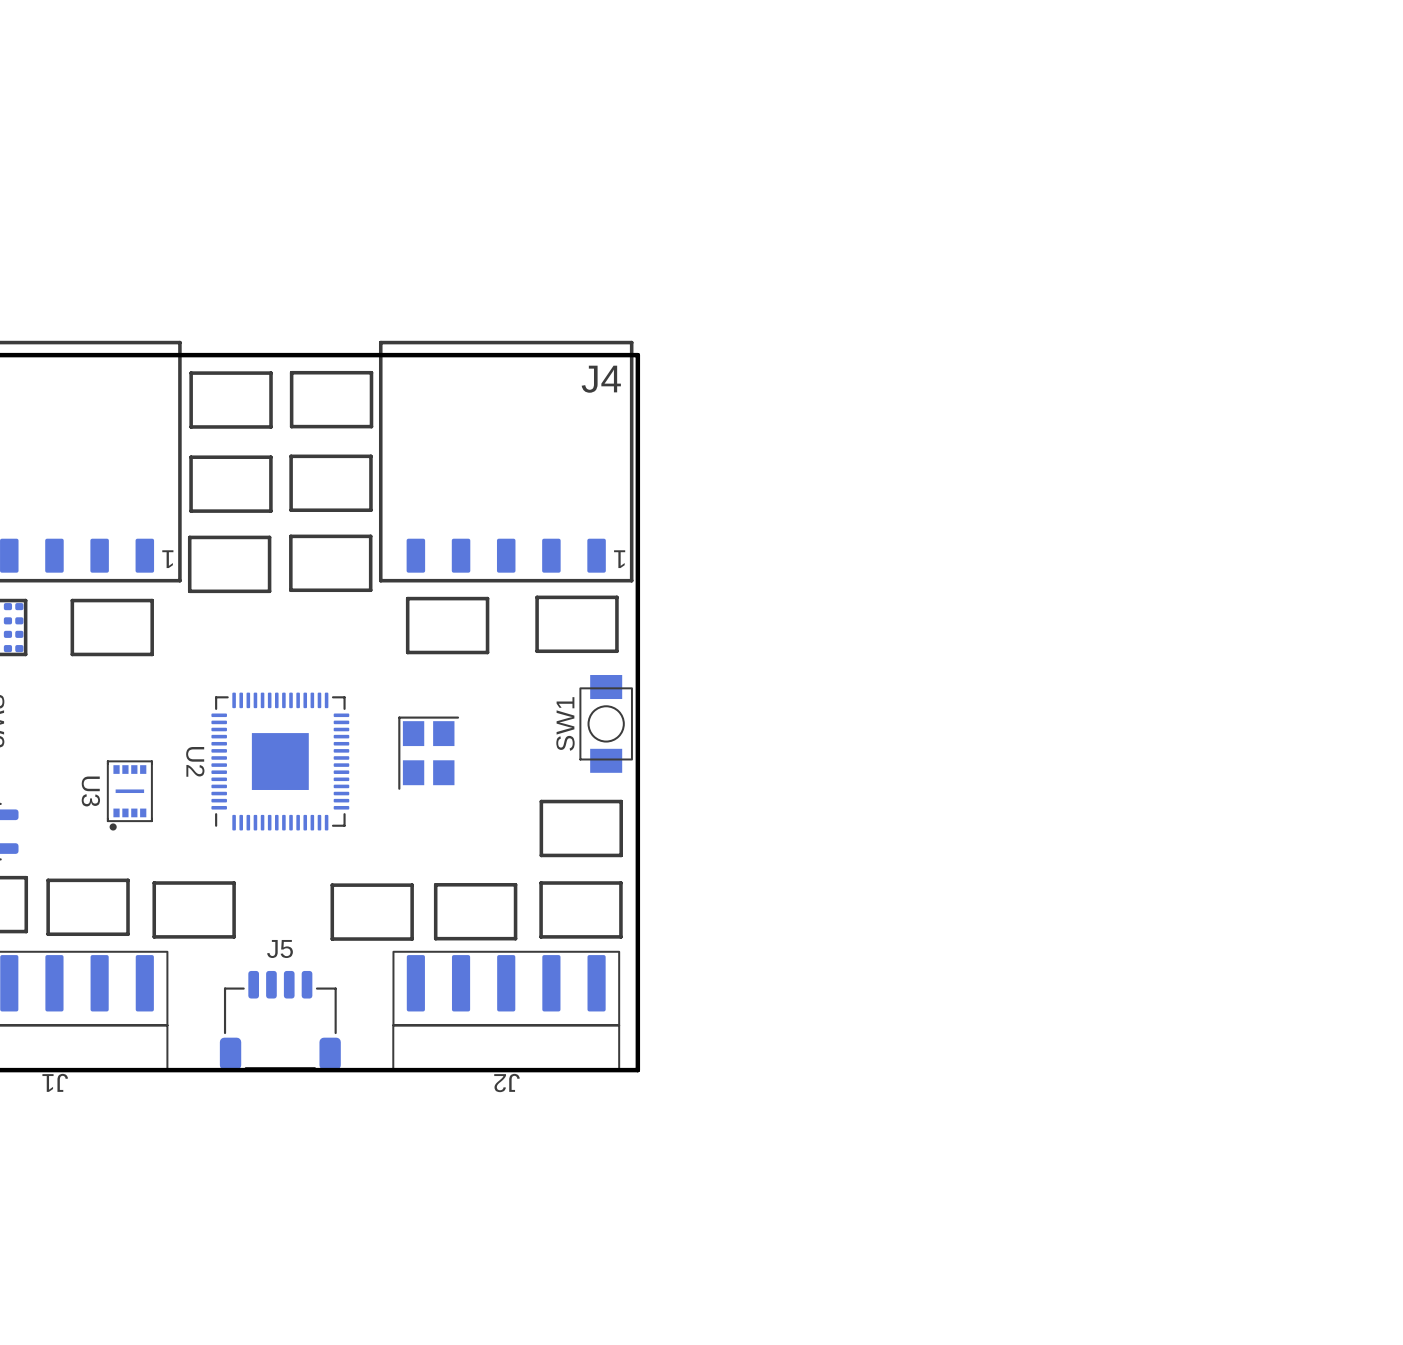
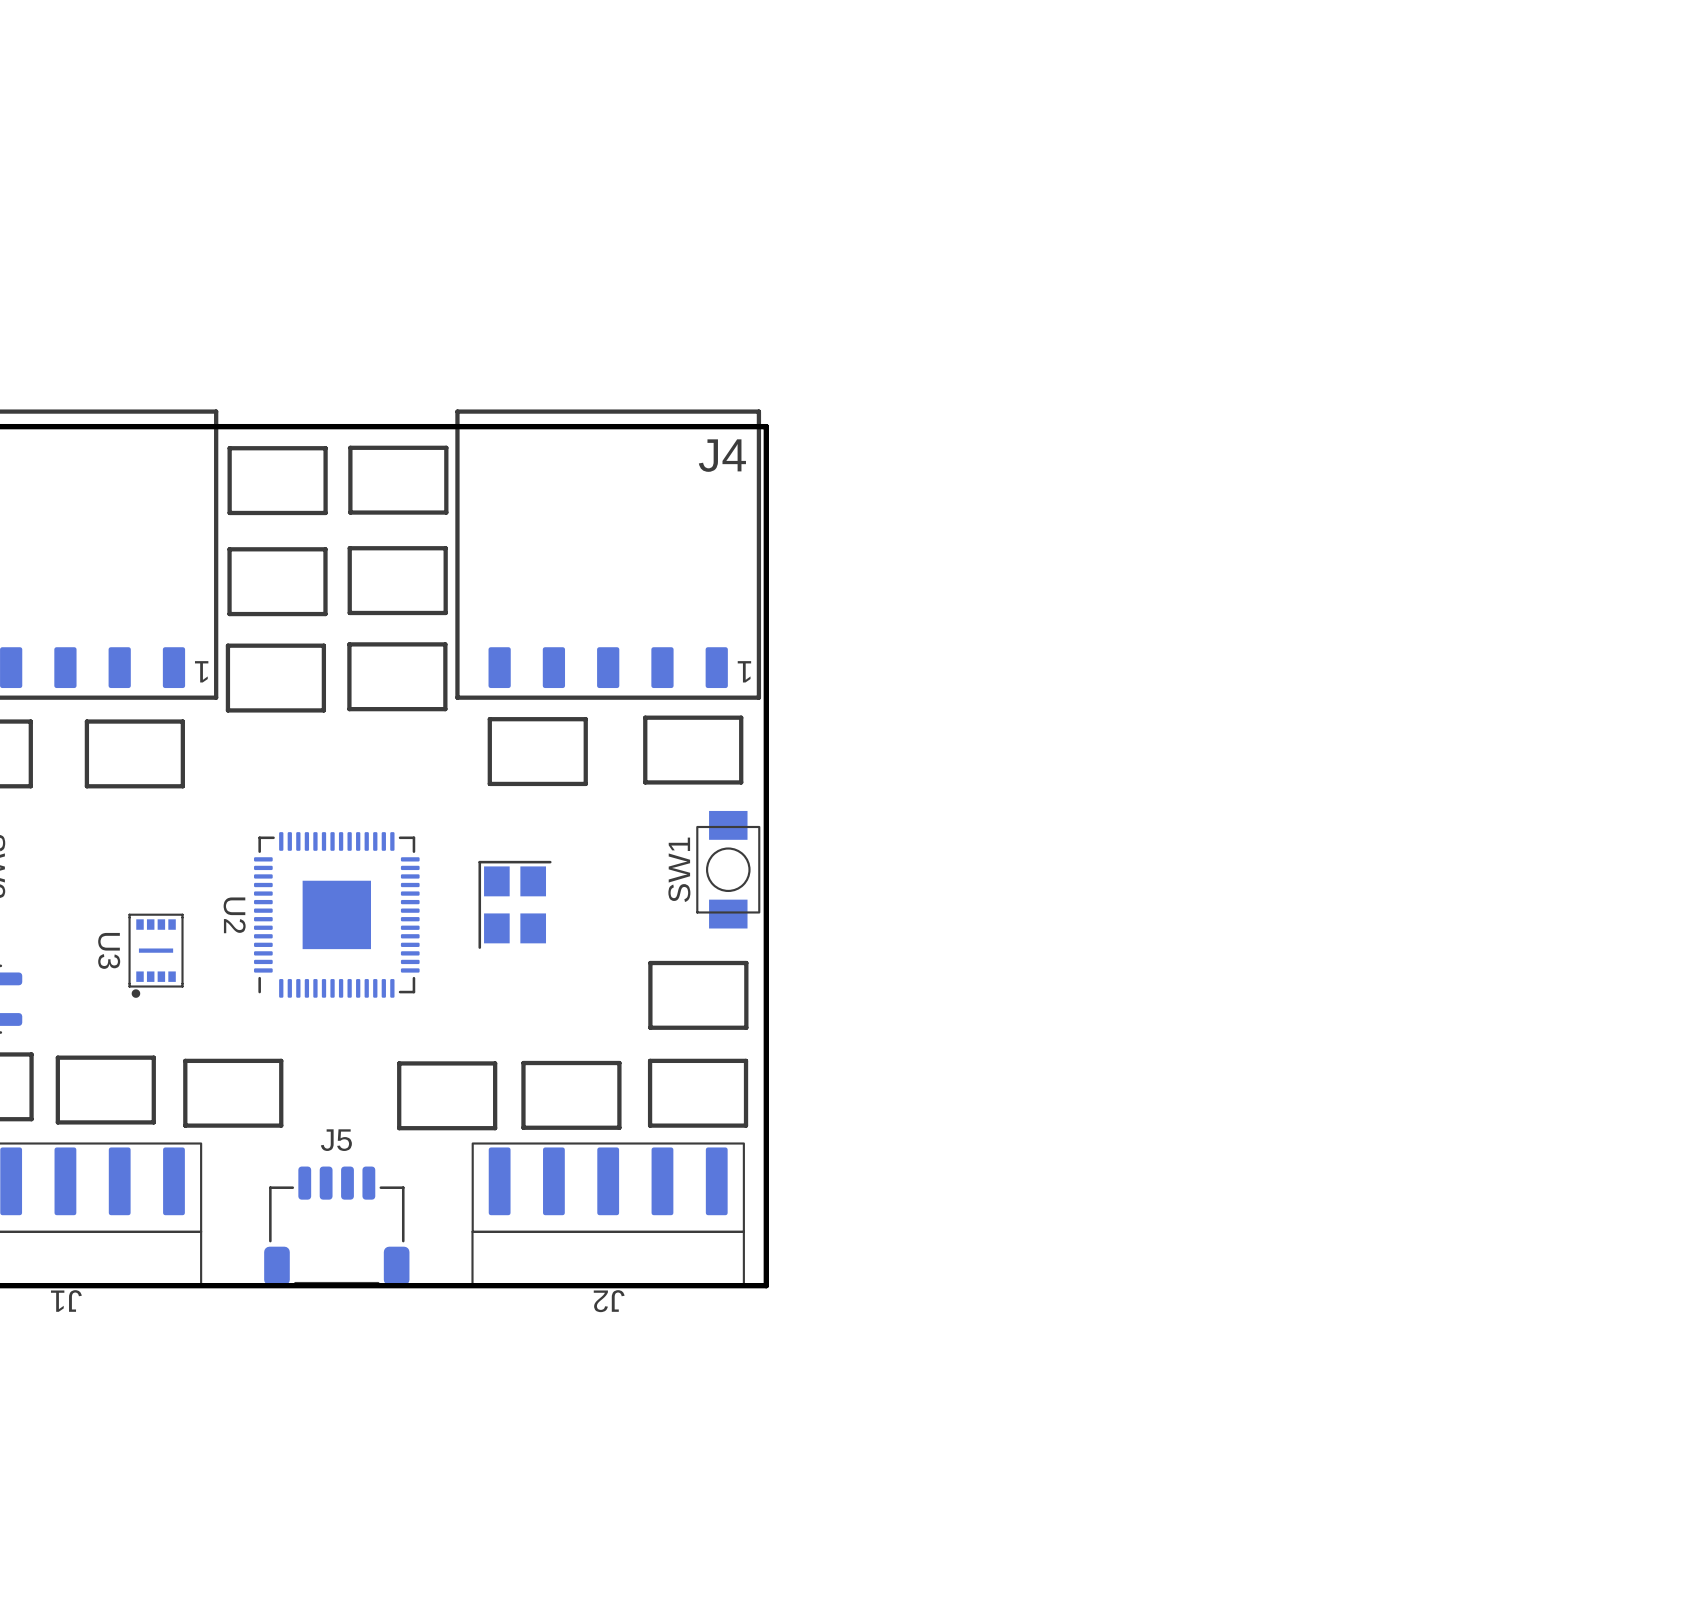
part: (13, 606) -> none
part: (13, 620) -> none
part: (13, 634) -> none
part: (13, 648) -> none

